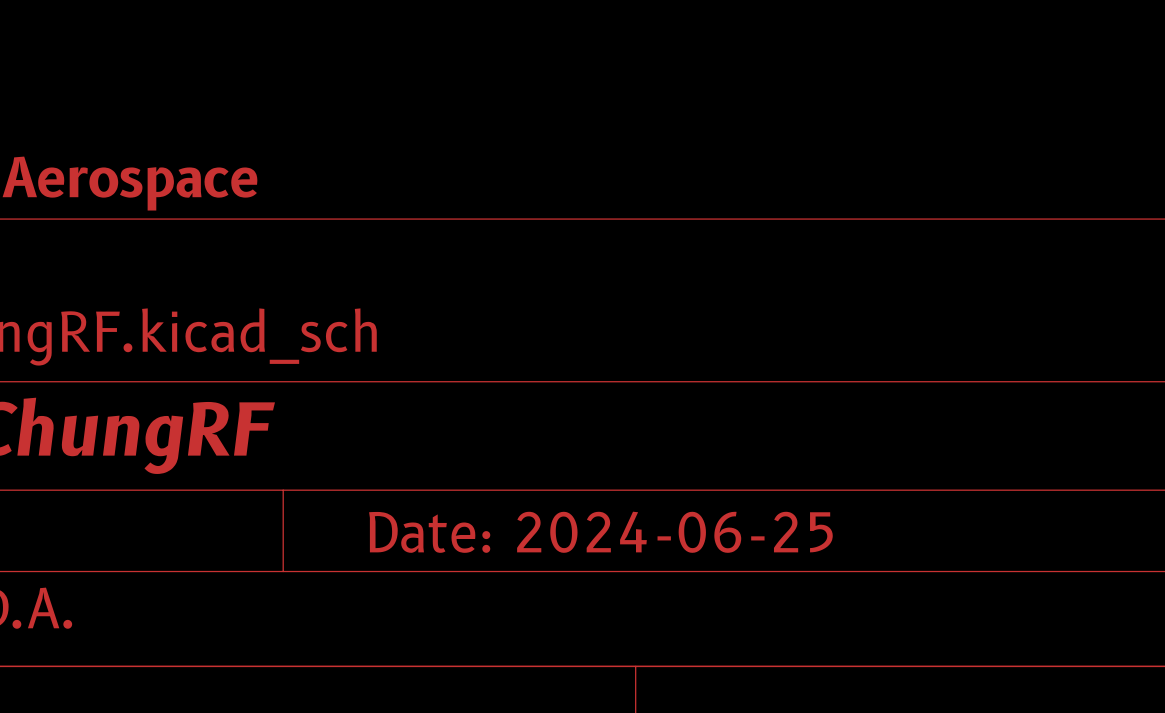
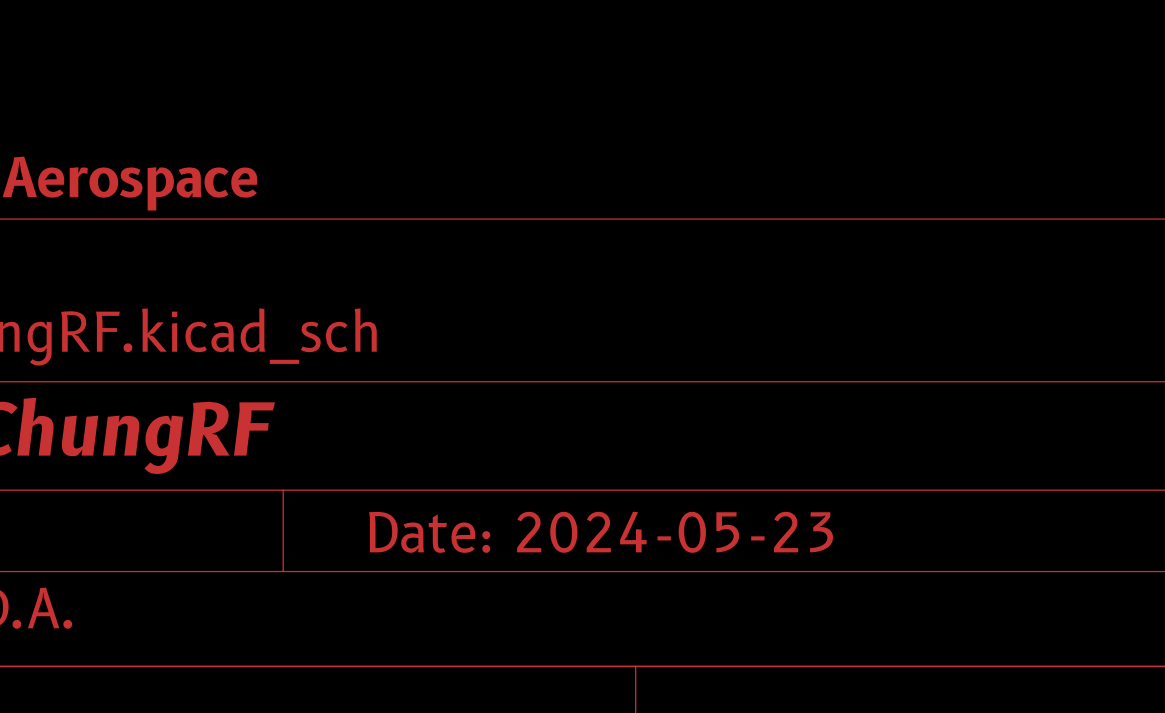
title block: Date: 2024-06-25 (600, 532) -> Date: 2024-05-23 (601, 532)

